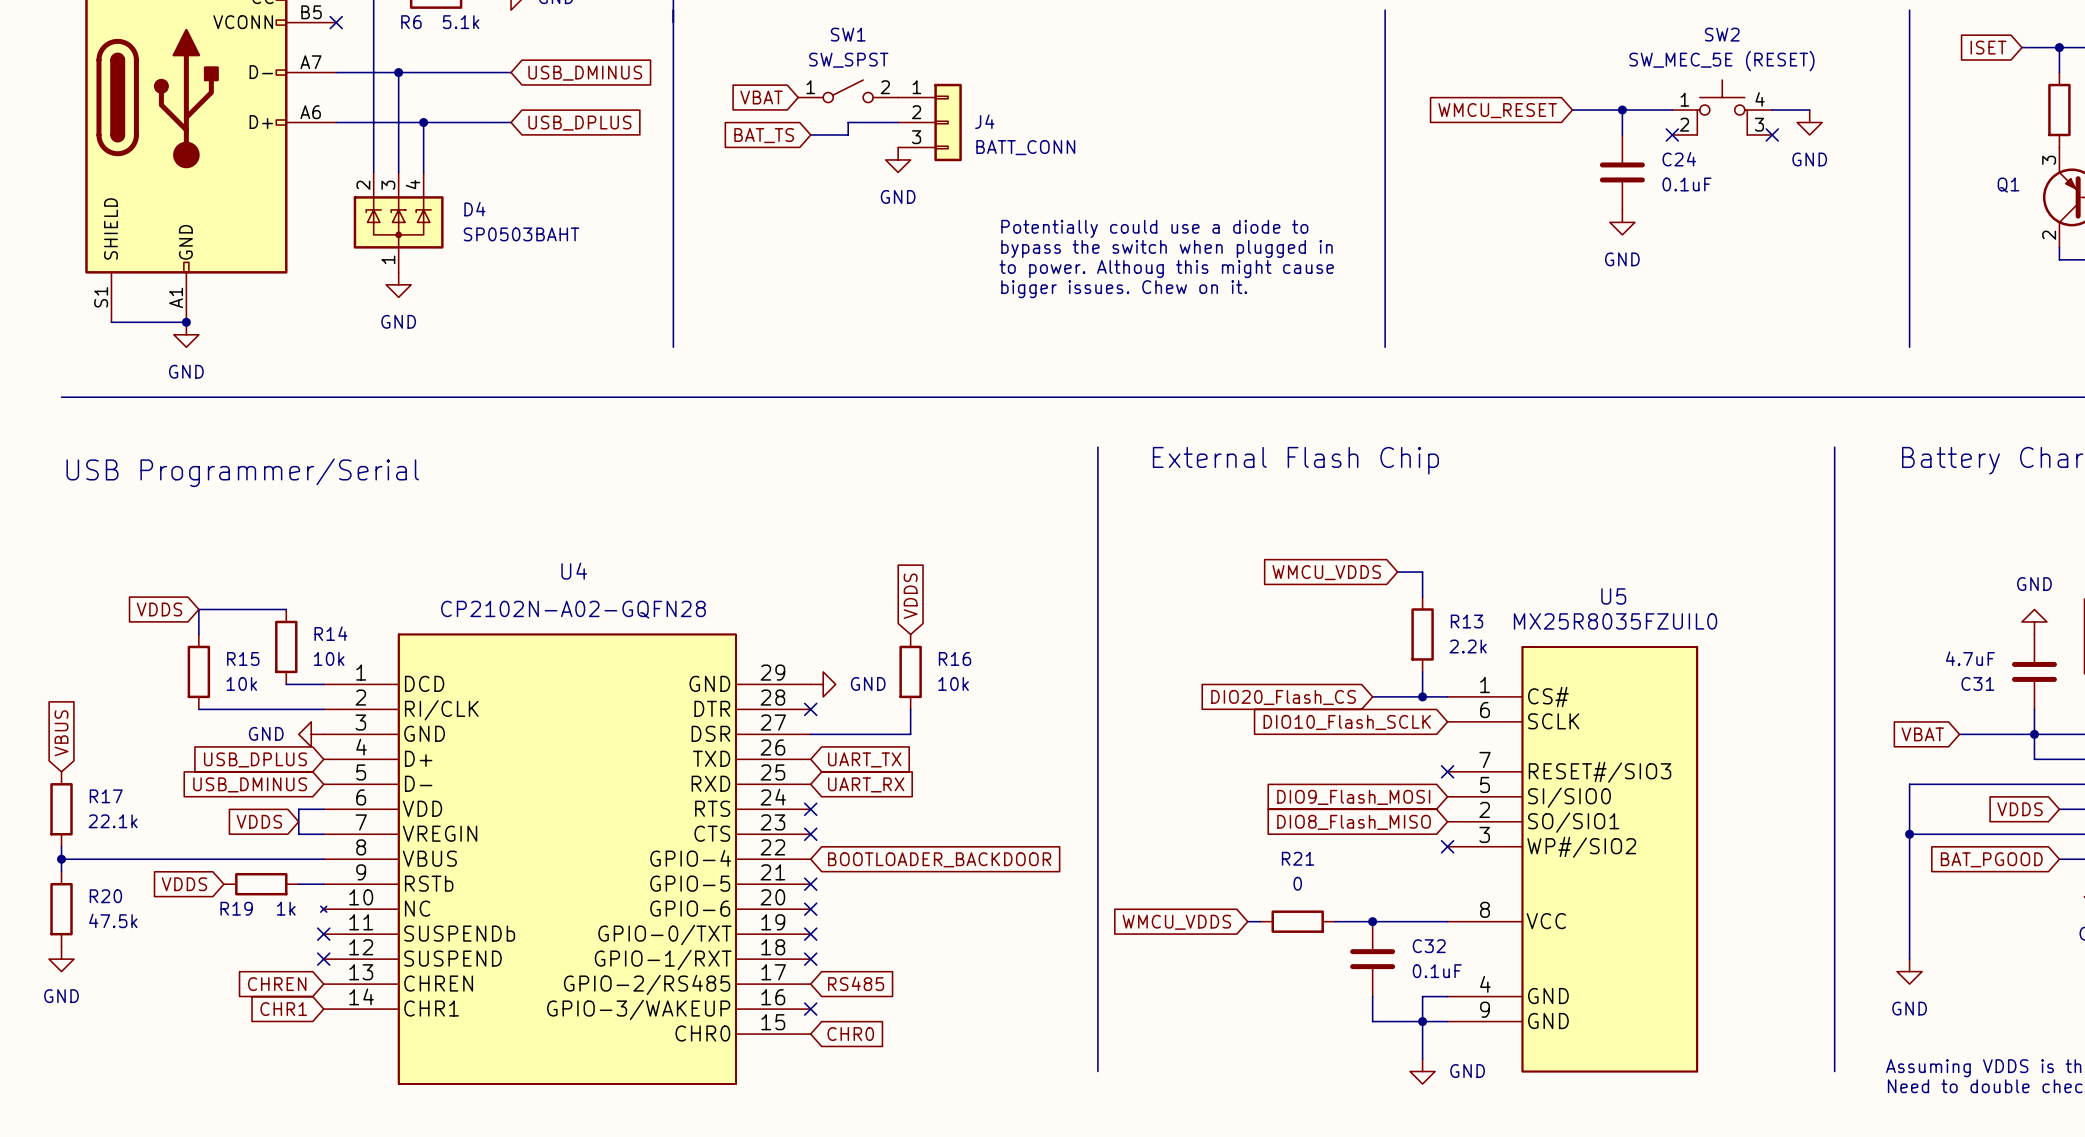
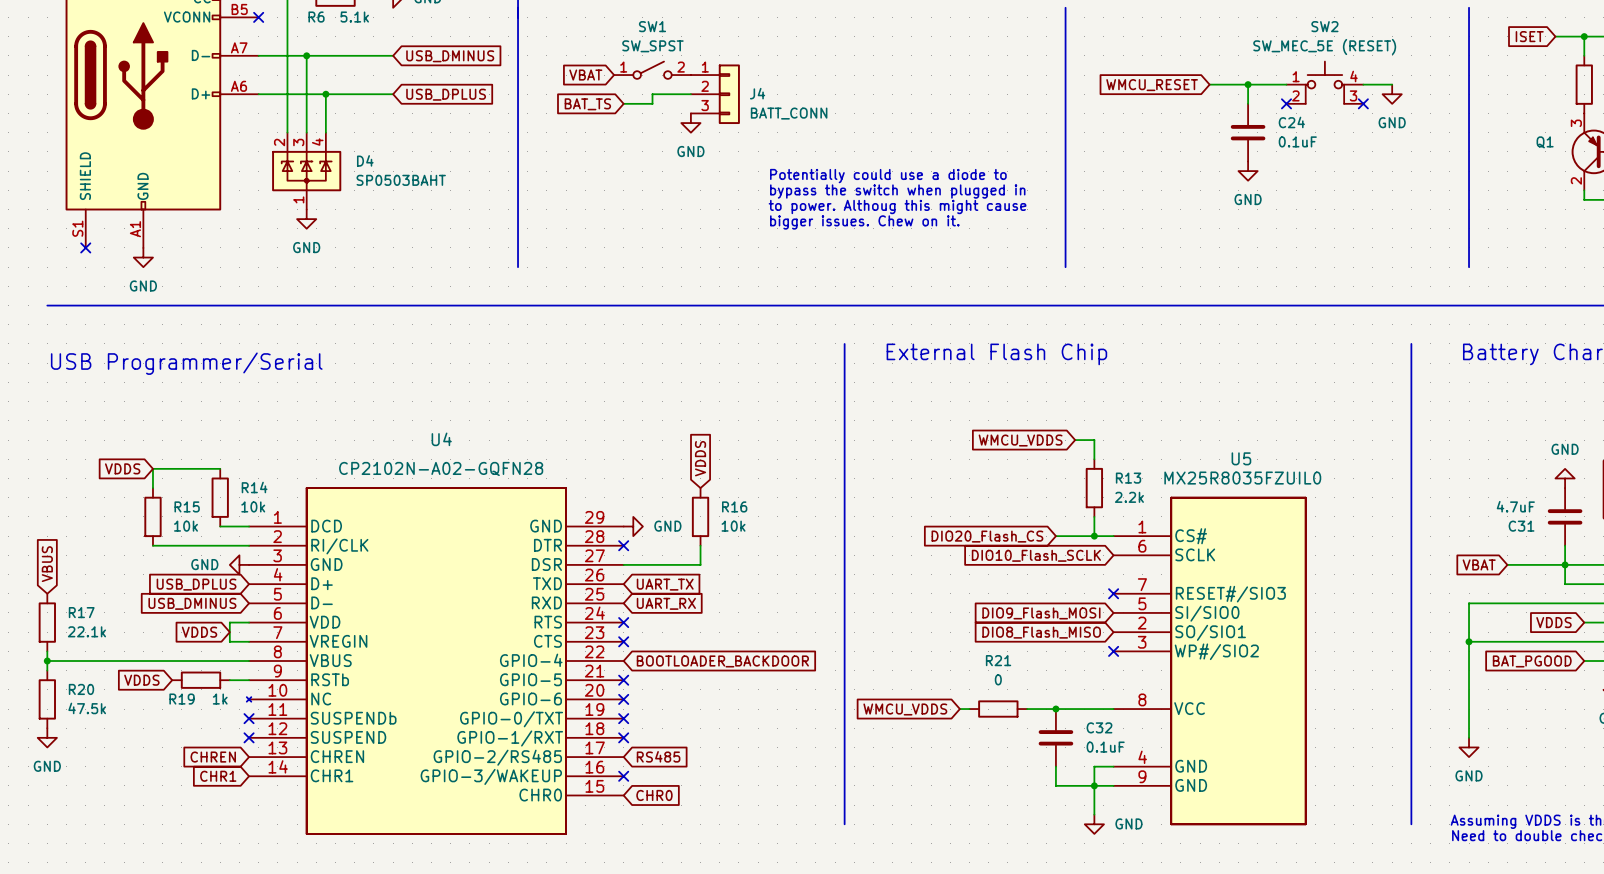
wire: (111, 322) (186, 322) -> none
no-connect mark: none -> (85, 247)
junction: (186, 322) -> none

